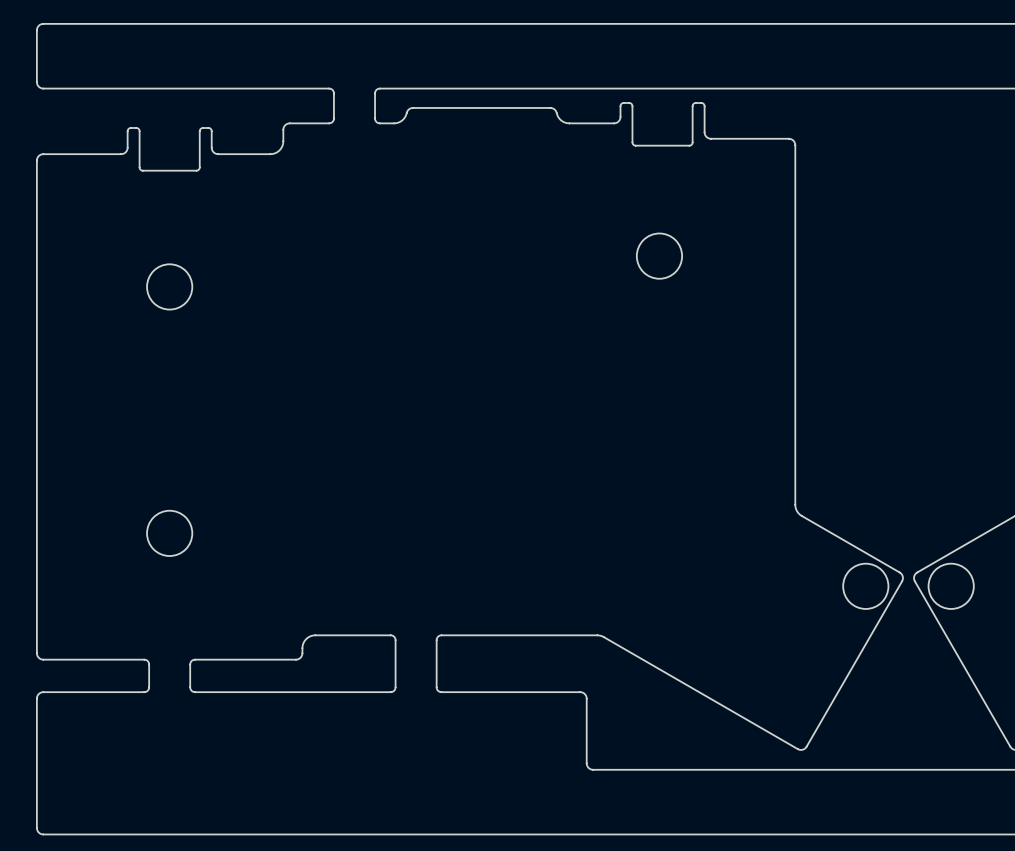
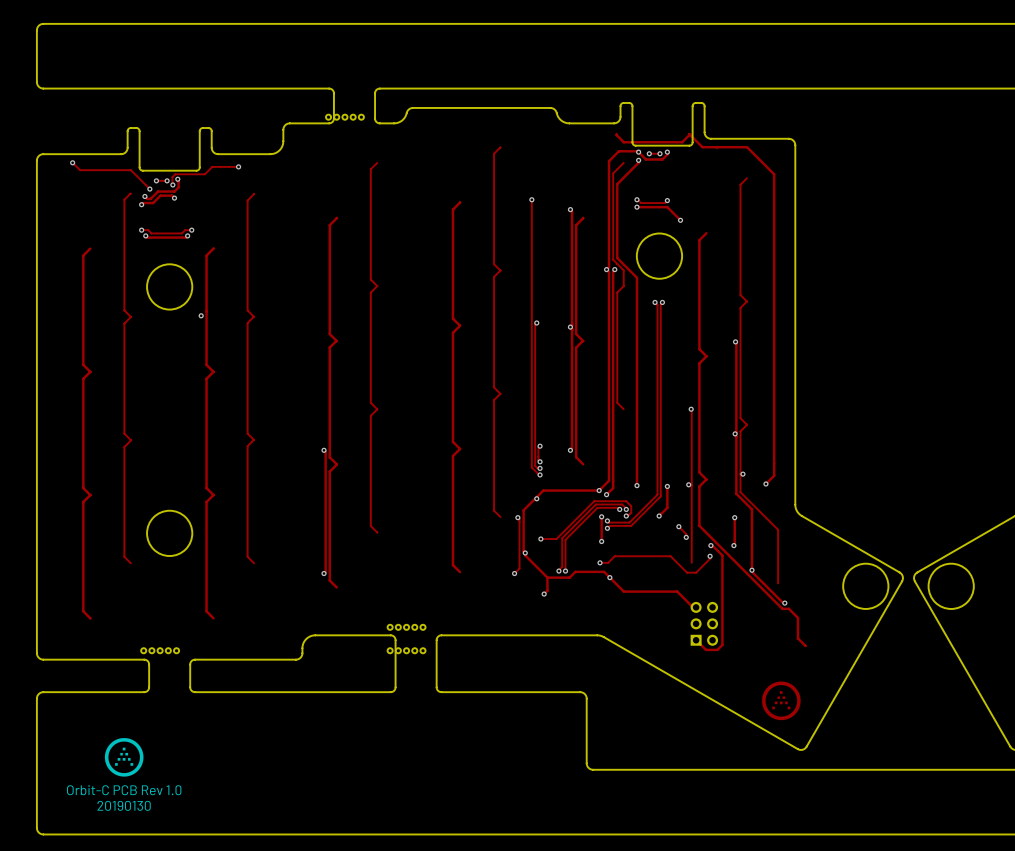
part: none -> (344, 117)
track: none -> (616, 134) (623, 142) (682, 142) (689, 134) (702, 147) (747, 147) (774, 174) (774, 475) (765, 483)
track: none -> (500, 147) (494, 153) (494, 264) (500, 270) (494, 276) (494, 387) (500, 393) (494, 400) (494, 510) (500, 517)
via: none -> (638, 152)
track: none -> (667, 152) (662, 159) (646, 159) (637, 151) (618, 151) (609, 161) (609, 267) (606, 269) (609, 272) (609, 480) (599, 490) (543, 490) (523, 510) (523, 551) (525, 555) (547, 577)
via: none -> (667, 152)
track: none -> (649, 153) (659, 153)
via: none -> (649, 153)
via: none -> (659, 153)
track: none -> (638, 160) (638, 162) (617, 184) (617, 258) (636, 277) (636, 485)
via: none -> (638, 160)
track: none -> (72, 162) (80, 170) (130, 170) (149, 189)
via: none -> (72, 162)
track: none -> (377, 162) (370, 169) (370, 279) (377, 286)
track: none -> (623, 162) (613, 173) (613, 259) (617, 263)
track: none -> (238, 166) (212, 166) (204, 174) (175, 174) (172, 177) (172, 184)
via: none -> (238, 166)
track: none -> (746, 178) (740, 184) (740, 295) (746, 301)
track: none -> (177, 179) (178, 187) (174, 191) (158, 191) (150, 198) (144, 196)
via: none -> (177, 179)
track: none -> (156, 180) (167, 180)
via: none -> (156, 180)
via: none -> (167, 180)
via: none -> (172, 184)
via: none -> (149, 189)
track: none -> (130, 193) (124, 199) (124, 310) (130, 316) (124, 323) (124, 433) (130, 440) (124, 447) (124, 556) (130, 563)
track: none -> (254, 193) (247, 200) (247, 310) (254, 316) (247, 322) (247, 433) (254, 440) (247, 446) (247, 556) (254, 563)
via: none -> (144, 196)
track: none -> (174, 198) (172, 195) (160, 195) (153, 203) (141, 204)
via: none -> (174, 198)
track: none -> (531, 199) (531, 467) (540, 474)
via: none -> (531, 199)
track: none -> (636, 199) (641, 203) (664, 203) (667, 200)
via: none -> (636, 199)
via: none -> (667, 200)
track: none -> (459, 202) (452, 209) (452, 318) (459, 325) (452, 332) (452, 441) (459, 448) (452, 456) (452, 565) (459, 572)
via: none -> (141, 204)
track: none -> (636, 207) (667, 207) (680, 220)
via: none -> (636, 207)
track: none -> (570, 209) (572, 211) (572, 448) (570, 451)
via: none -> (570, 209)
track: none -> (336, 217) (329, 225) (329, 334) (336, 341) (329, 347) (329, 457) (336, 464) (329, 471) (329, 580) (336, 587)
track: none -> (583, 217) (576, 225) (576, 334) (583, 341) (576, 347) (576, 457) (583, 464)
via: none -> (680, 220)
track: none -> (141, 230) (148, 230) (151, 233) (181, 233) (185, 230) (191, 230)
via: none -> (141, 230)
via: none -> (191, 230)
track: none -> (706, 233) (699, 240) (699, 349) (706, 356) (699, 363) (699, 472) (706, 479) (699, 486) (699, 525) (782, 608) (788, 608) (797, 617) (797, 638) (805, 646)
track: none -> (145, 235) (147, 237) (186, 237) (187, 235)
via: none -> (145, 235)
via: none -> (187, 235)
track: none -> (90, 248) (83, 255) (83, 364) (90, 371) (83, 378) (83, 488) (90, 495) (83, 502) (83, 611) (90, 618)
track: none -> (213, 248) (206, 255) (206, 364) (213, 371) (206, 378) (206, 488) (213, 495) (206, 502) (206, 611) (213, 618)
track: none -> (617, 263) (623, 270) (623, 286) (617, 292) (617, 402) (623, 409)
via: none -> (606, 269)
track: none -> (614, 269) (613, 271) (613, 488) (606, 494)
via: none -> (614, 269)
track: none -> (377, 286) (370, 292) (370, 402) (377, 409)
track: none -> (746, 301) (740, 307) (740, 418) (746, 424)
track: none -> (655, 302) (657, 304) (657, 494) (629, 522) (609, 522) (607, 520)
via: none -> (655, 302)
track: none -> (662, 302) (660, 304) (660, 496) (631, 525) (609, 525) (607, 528)
via: none -> (662, 302)
via: none -> (201, 315)
track: none -> (536, 322) (535, 324) (535, 465) (540, 468)
via: none -> (536, 322)
via: none -> (570, 327)
track: none -> (735, 341) (736, 493) (751, 509) (751, 571) (784, 603)
via: none -> (735, 341)
track: none -> (377, 409) (370, 415) (370, 526) (377, 532)
track: none -> (691, 409) (691, 562)
via: none -> (691, 409)
track: none -> (746, 424) (740, 431) (740, 492) (778, 529) (778, 583)
via: none -> (735, 433)
track: none -> (540, 446) (538, 447) (540, 461)
via: none -> (540, 446)
track: none -> (324, 450) (325, 451) (325, 571) (324, 573)
via: none -> (324, 450)
via: none -> (570, 450)
via: none -> (540, 461)
via: none -> (540, 468)
via: none -> (540, 474)
via: none -> (742, 474)
via: none -> (765, 483)
via: none -> (688, 484)
via: none -> (636, 485)
track: none -> (667, 486) (667, 507) (659, 516)
via: none -> (667, 486)
via: none -> (599, 490)
via: none -> (606, 494)
via: none -> (536, 498)
track: none -> (619, 509) (618, 507) (597, 507) (565, 539) (565, 571)
via: none -> (619, 509)
track: none -> (626, 509) (622, 504) (595, 504) (562, 538) (562, 566) (558, 571)
via: none -> (626, 509)
track: none -> (601, 516) (601, 541)
via: none -> (601, 516)
track: none -> (626, 516) (631, 512) (631, 506) (626, 501) (594, 501) (556, 539) (540, 539)
via: none -> (626, 516)
via: none -> (659, 516)
track: none -> (517, 517) (519, 519) (519, 568) (514, 573)
via: none -> (517, 517)
track: none -> (734, 517) (733, 545)
via: none -> (734, 517)
via: none -> (607, 520)
track: none -> (678, 526) (686, 534) (686, 537)
via: none -> (678, 526)
via: none -> (607, 528)
via: none -> (686, 537)
via: none -> (540, 539)
via: none -> (601, 541)
track: none -> (710, 545) (722, 555) (722, 644) (717, 649) (705, 649) (696, 640)
via: none -> (710, 545)
via: none -> (733, 545)
via: none -> (525, 552)
track: none -> (710, 556) (710, 558) (696, 572) (687, 572) (670, 556) (614, 556) (608, 562) (600, 562)
via: none -> (710, 556)
via: none -> (600, 562)
via: none -> (751, 570)
via: none -> (558, 571)
via: none -> (565, 571)
via: none -> (324, 573)
via: none -> (514, 573)
track: none -> (547, 577) (547, 590) (544, 594)
track: none -> (547, 577) (569, 577) (575, 571) (604, 571) (623, 591) (677, 591) (693, 607) (696, 607)
via: none -> (609, 577)
via: none -> (544, 594)
via: none -> (784, 603)
part: none -> (704, 623)
part: none -> (406, 627)
part: none -> (160, 650)
part: none -> (406, 650)
drawing: none -> [762, 681, 801, 721]
drawing: none -> [104, 738, 144, 777]
text: none -> Orbit-C PCB Rev 1.0 (124, 790)
text: none -> 20190130 (124, 805)

